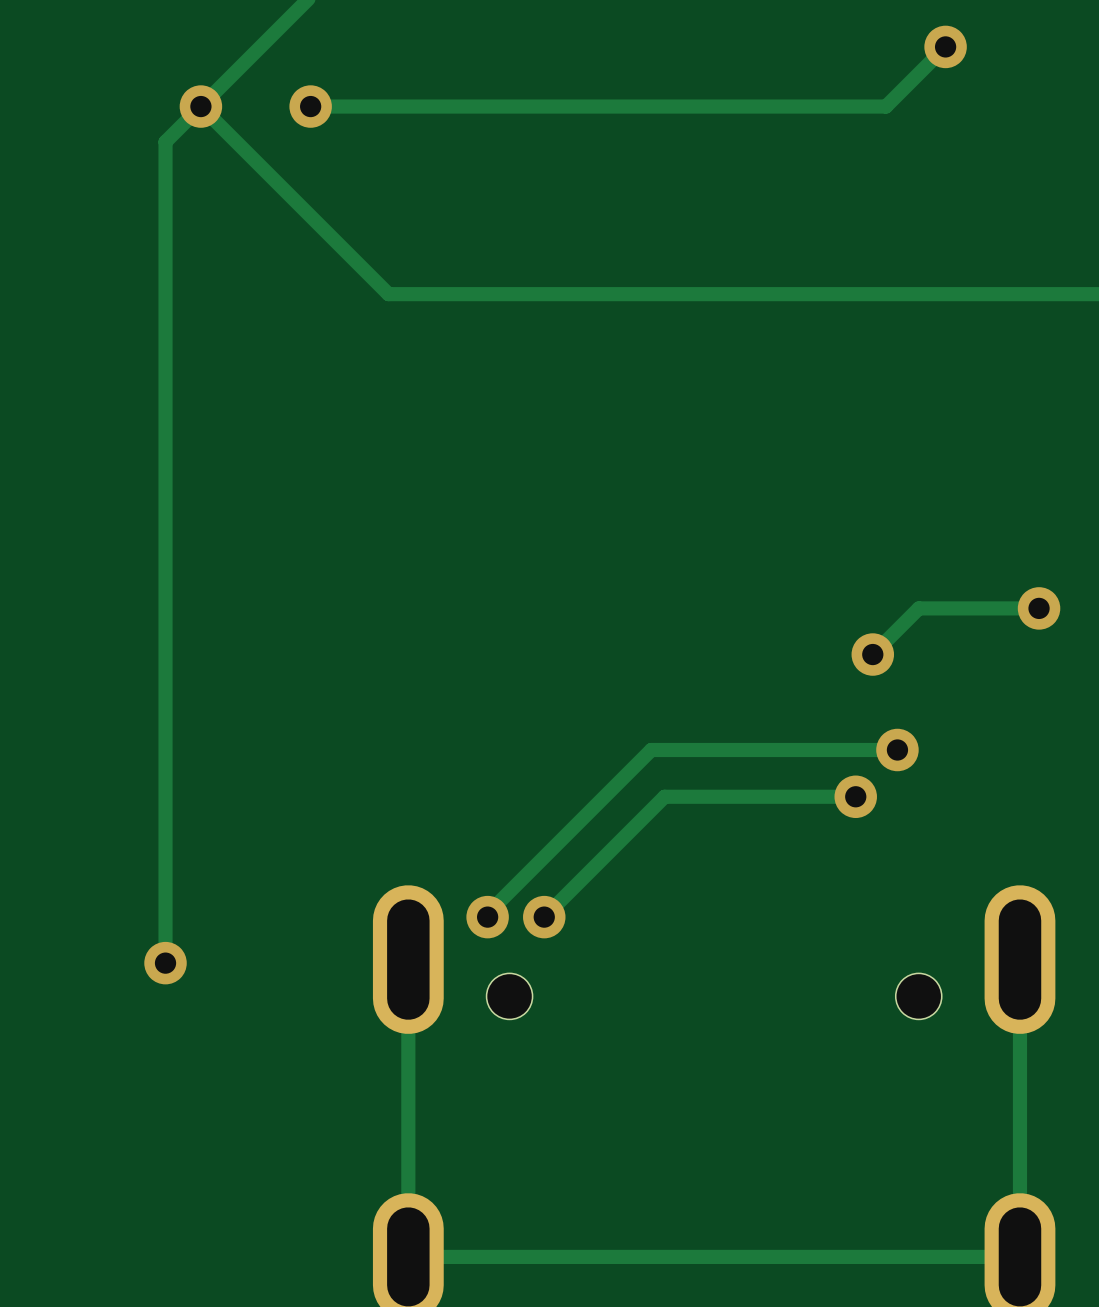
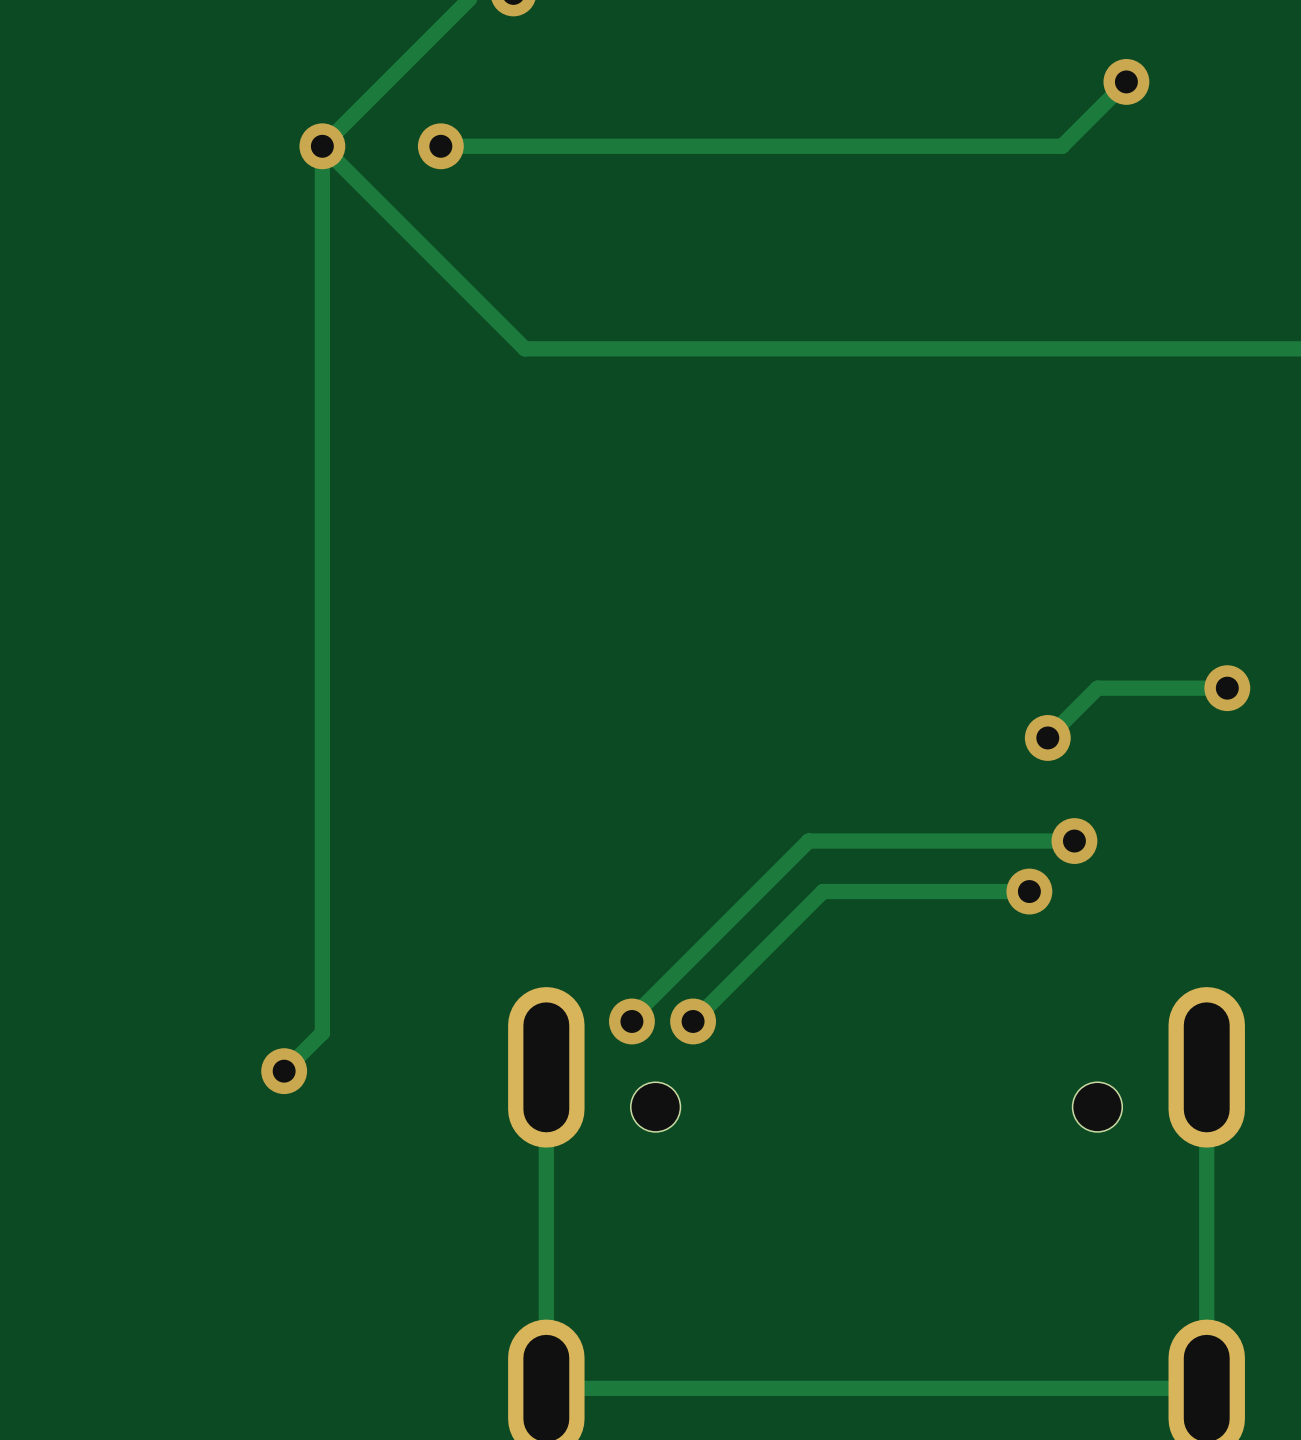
track: (200, 106) (165, 141) (165, 963) -> (322, 146) (322, 1032) (284, 1071)

